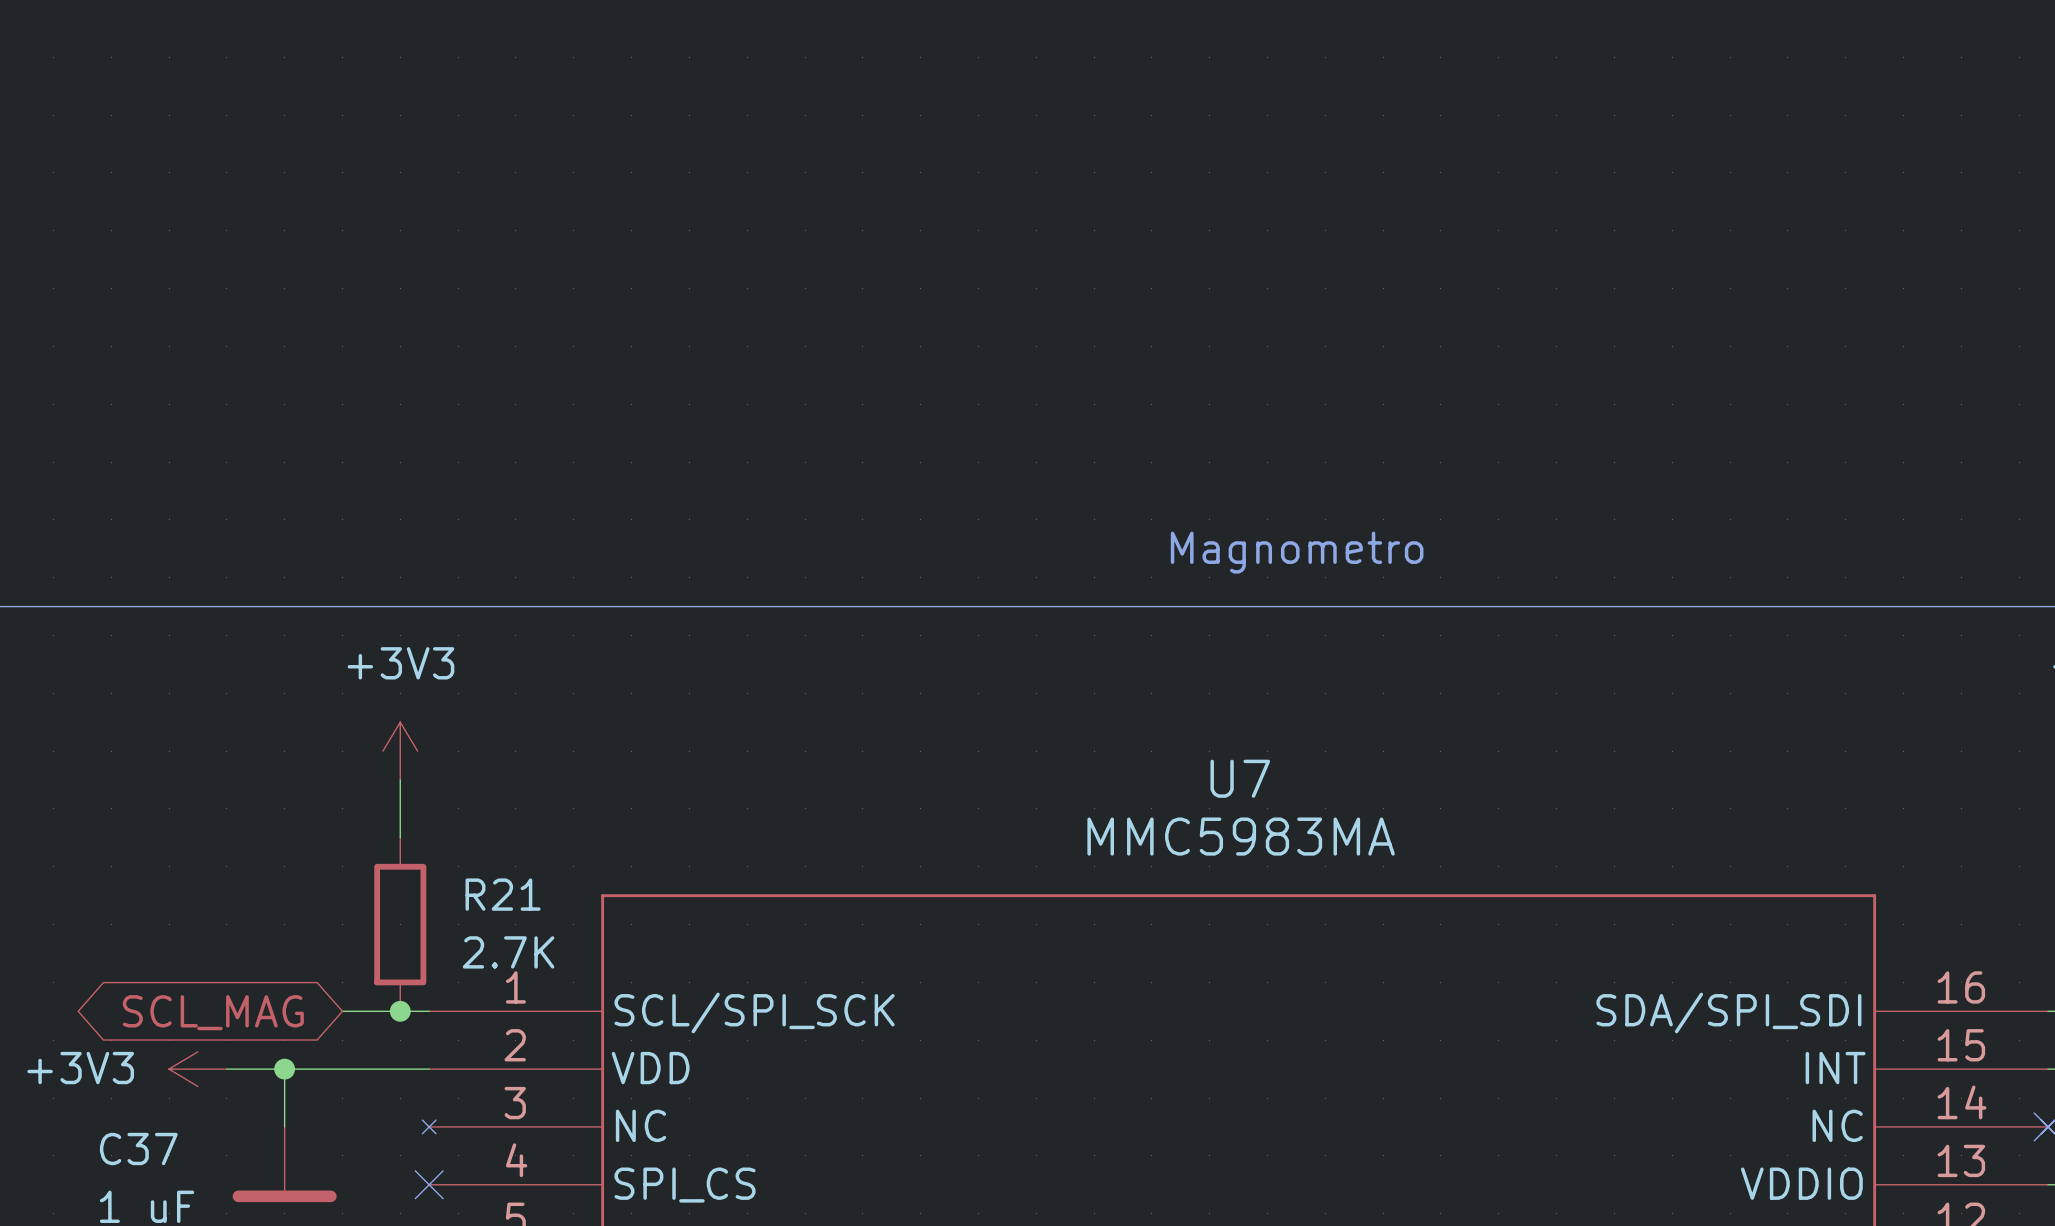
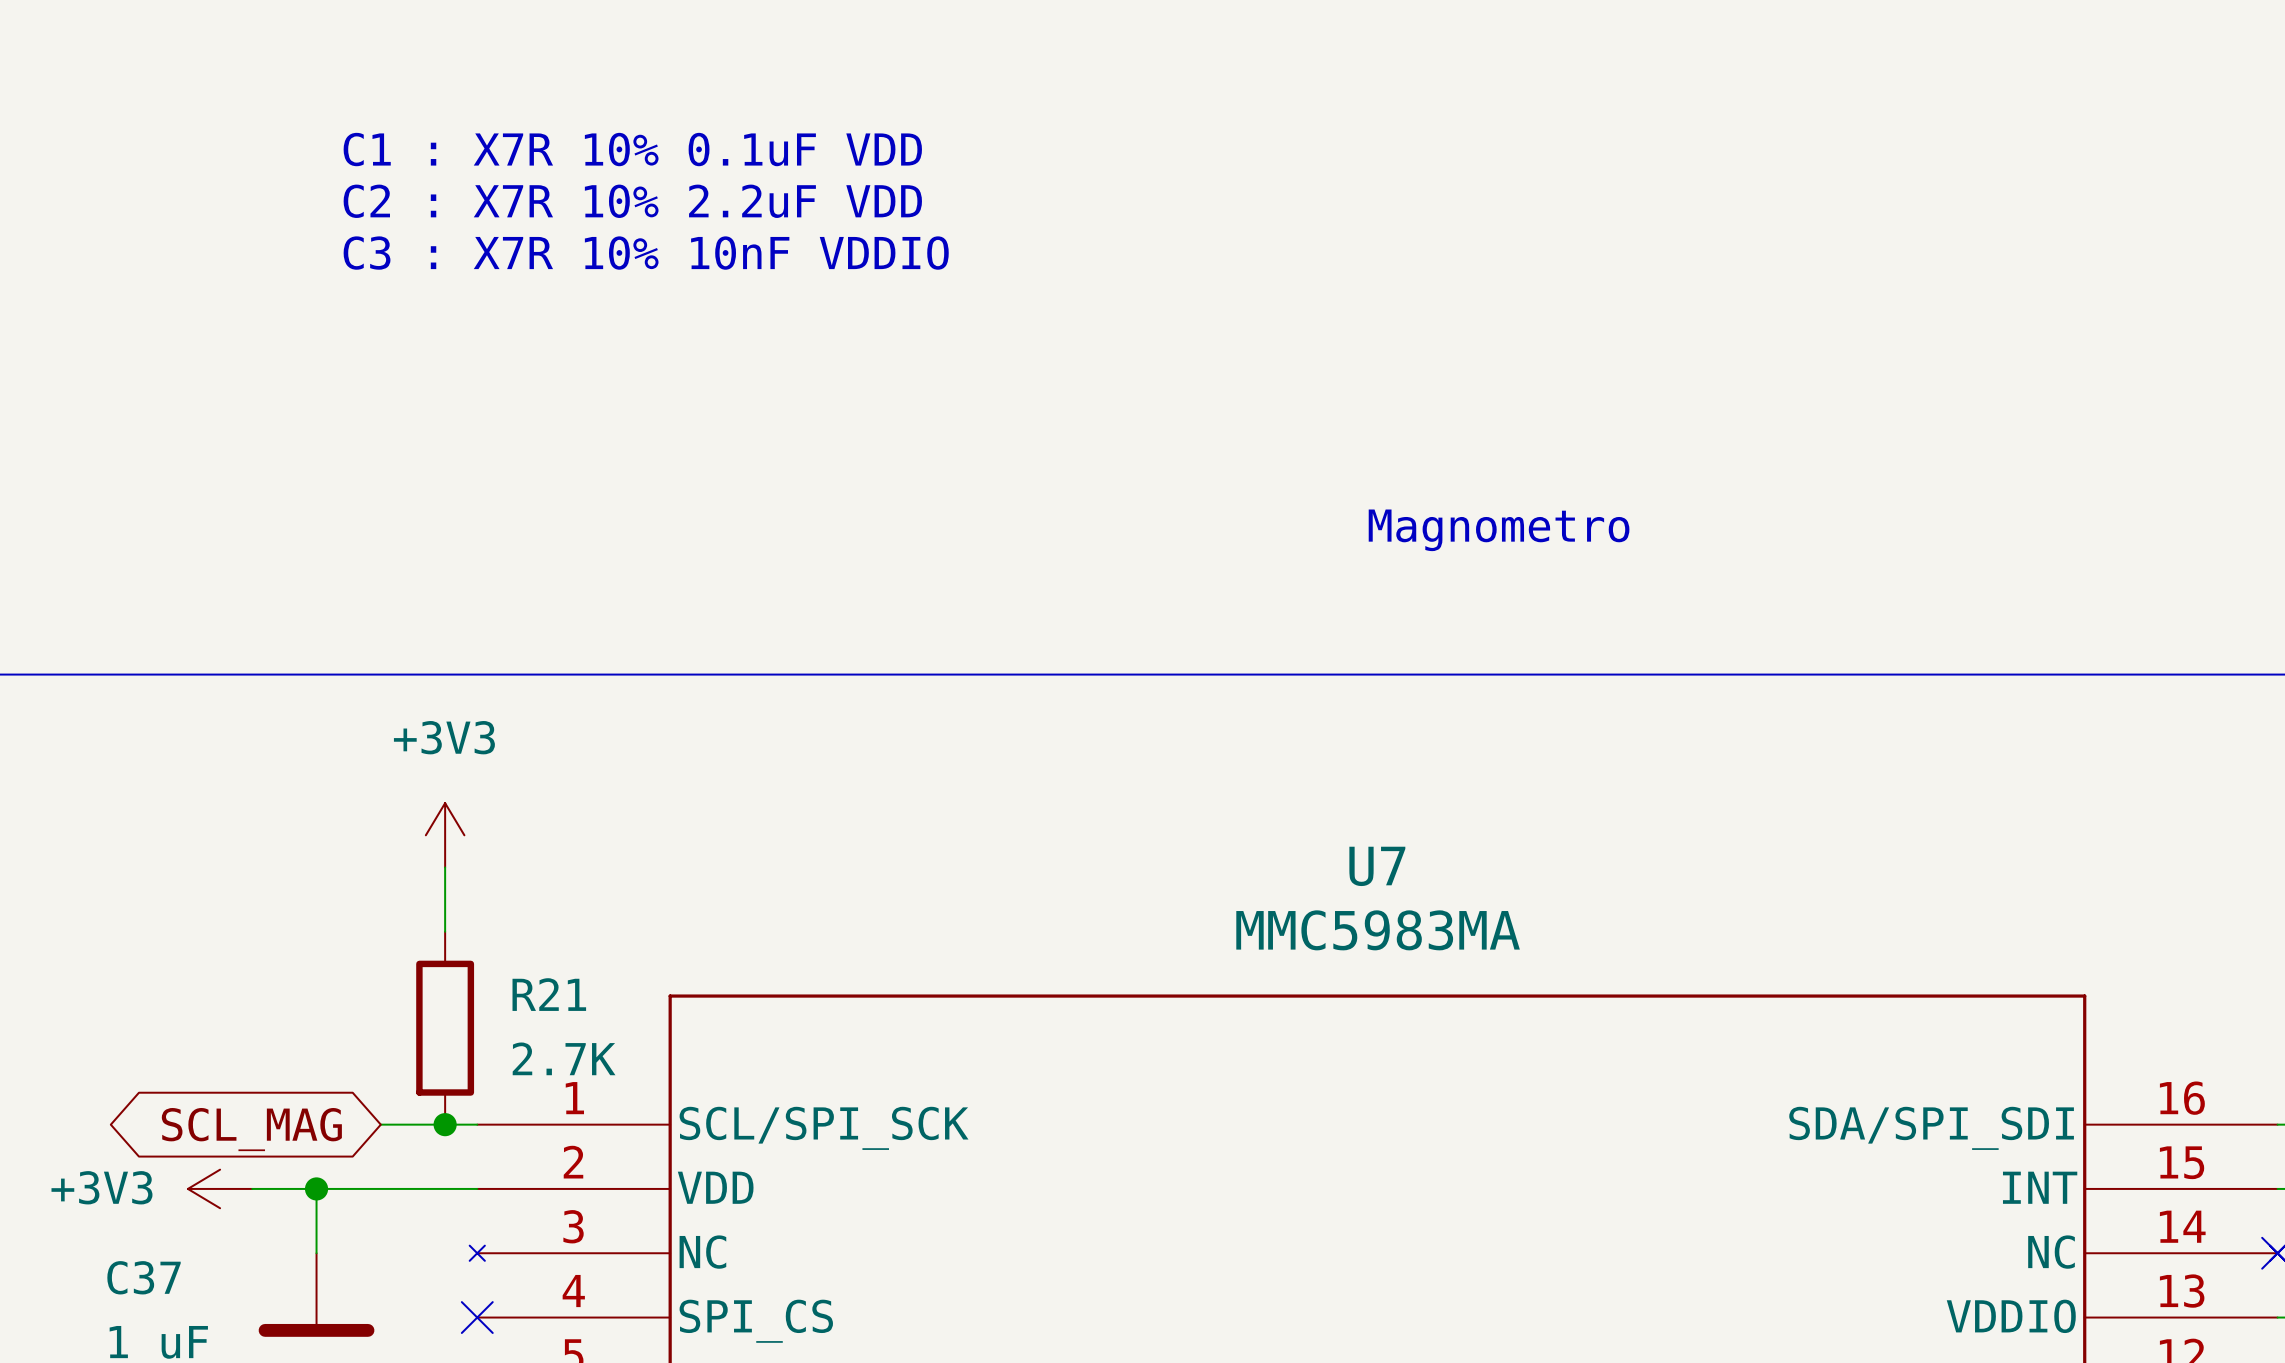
text: none -> C1 : X7R 10% 0.1uF VDD (632, 149)
text: none -> C2 : X7R 10% 2.2uF VDD (632, 201)
text: none -> C3 : X7R 10% 10nF VDDIO (646, 253)
text position: Magnometro (1297, 552) -> Magnometro (1499, 530)

